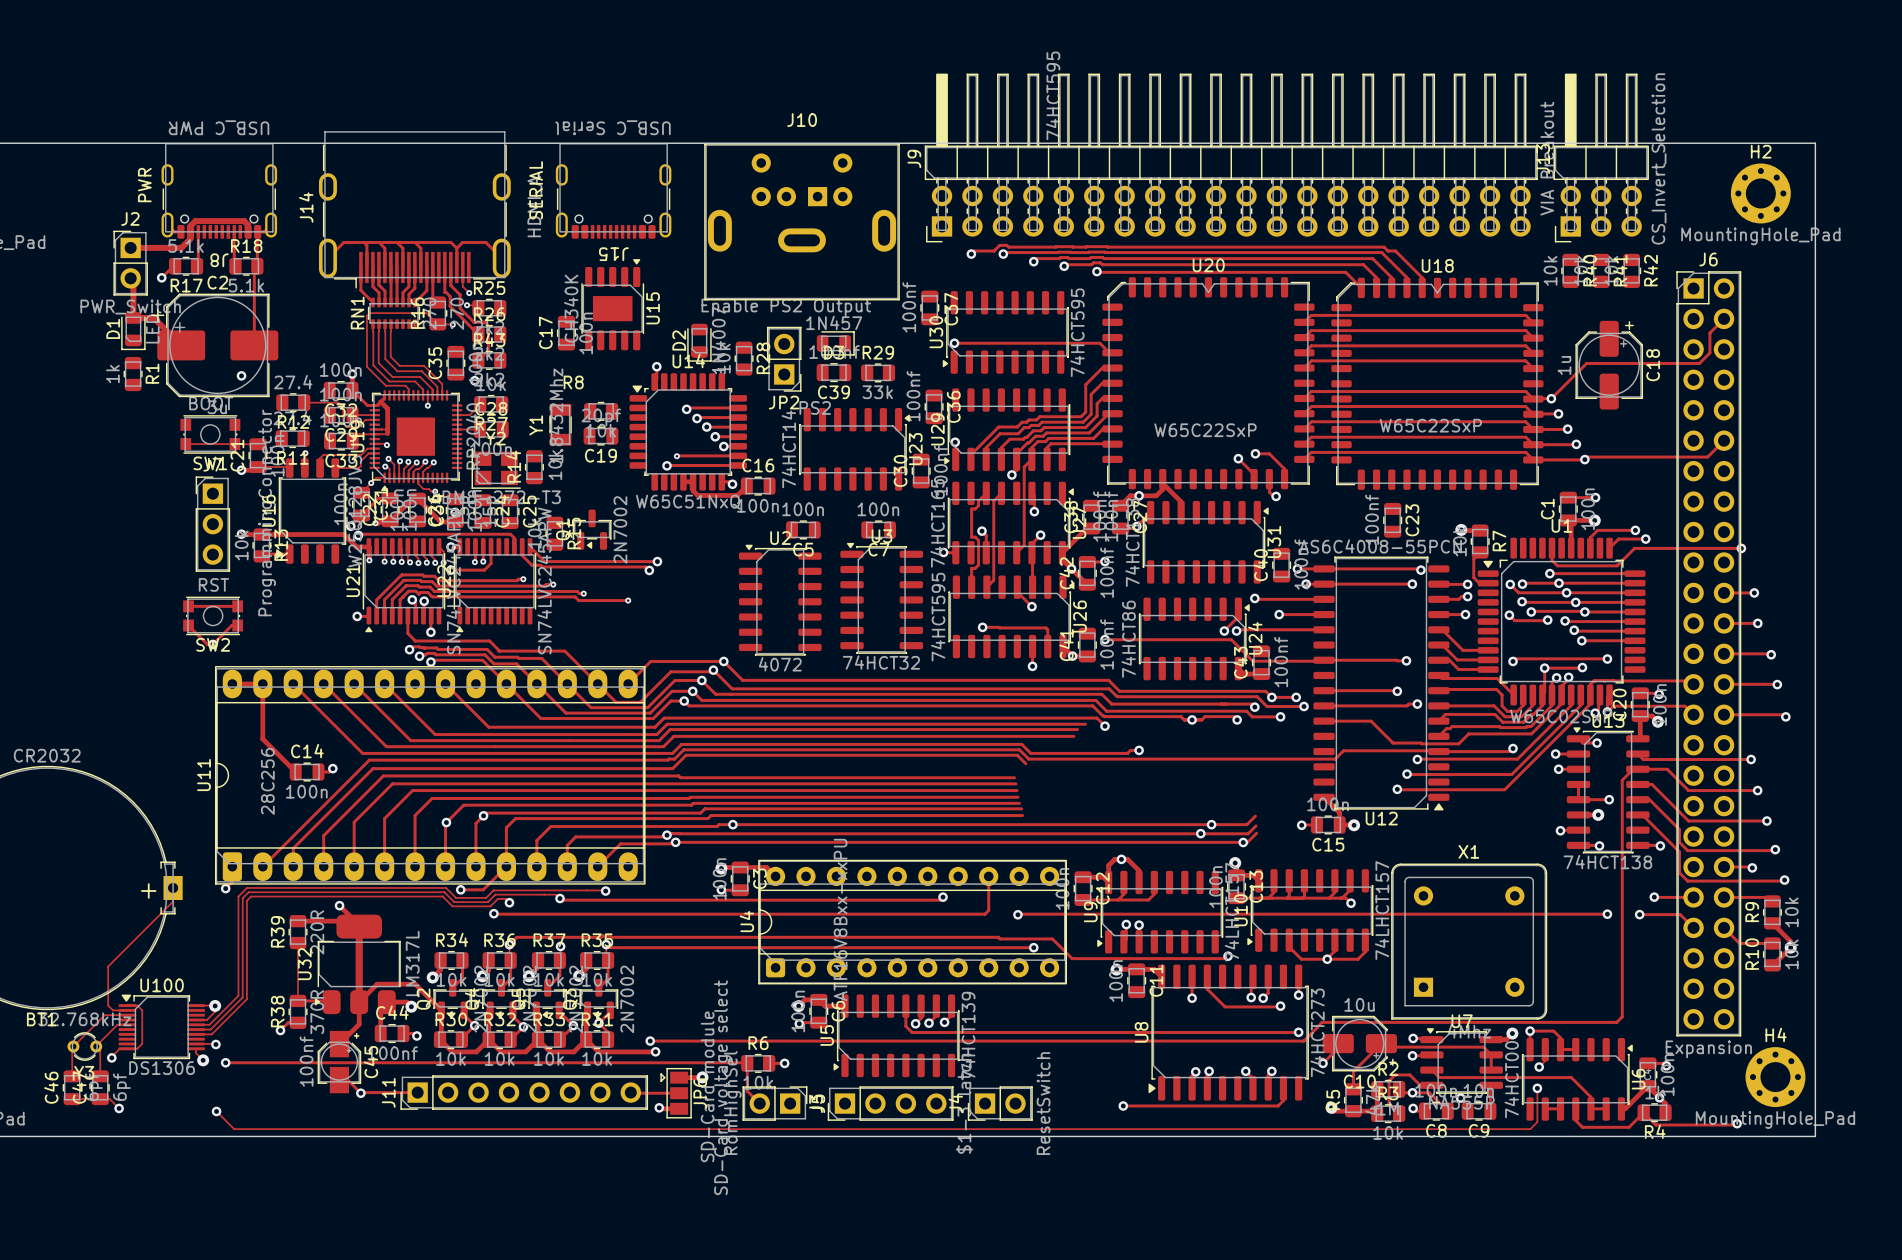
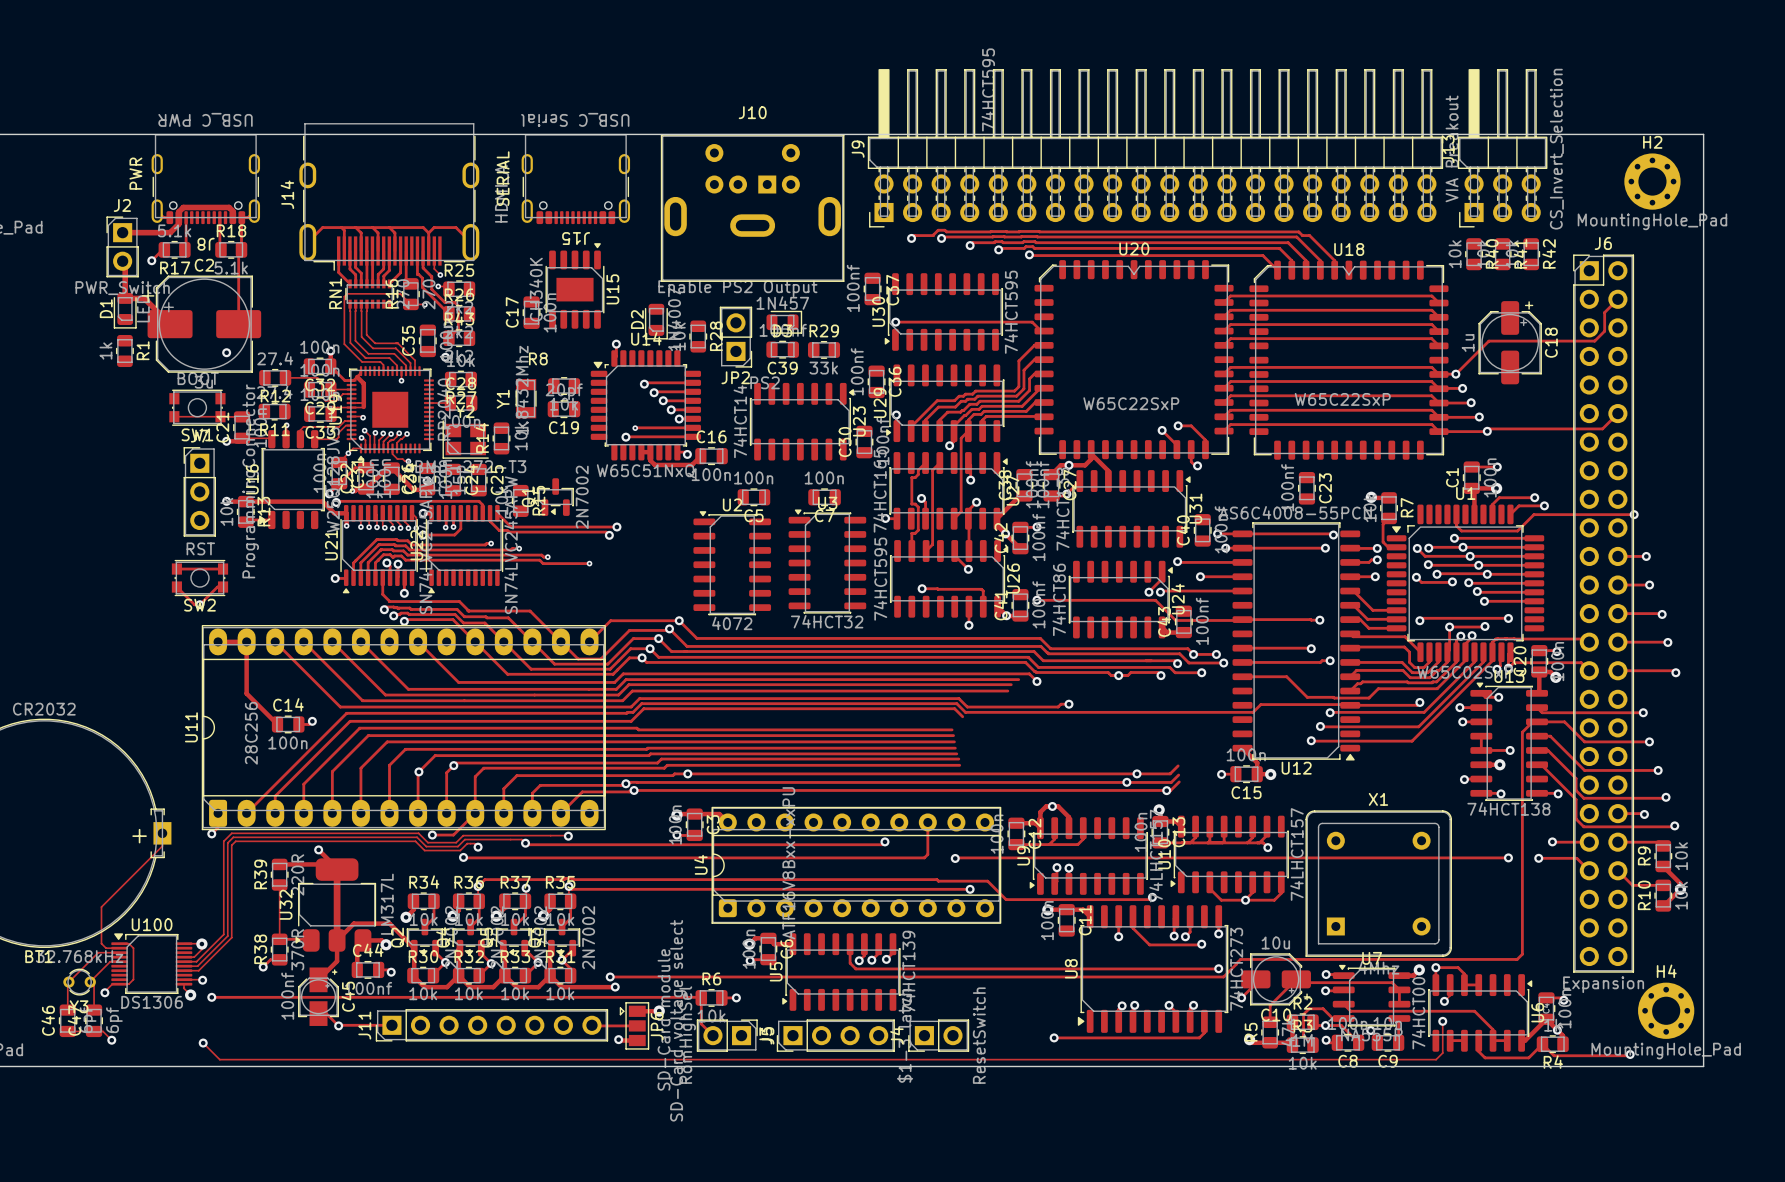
track: (480, 404) (469, 415) (457, 415) -> none

